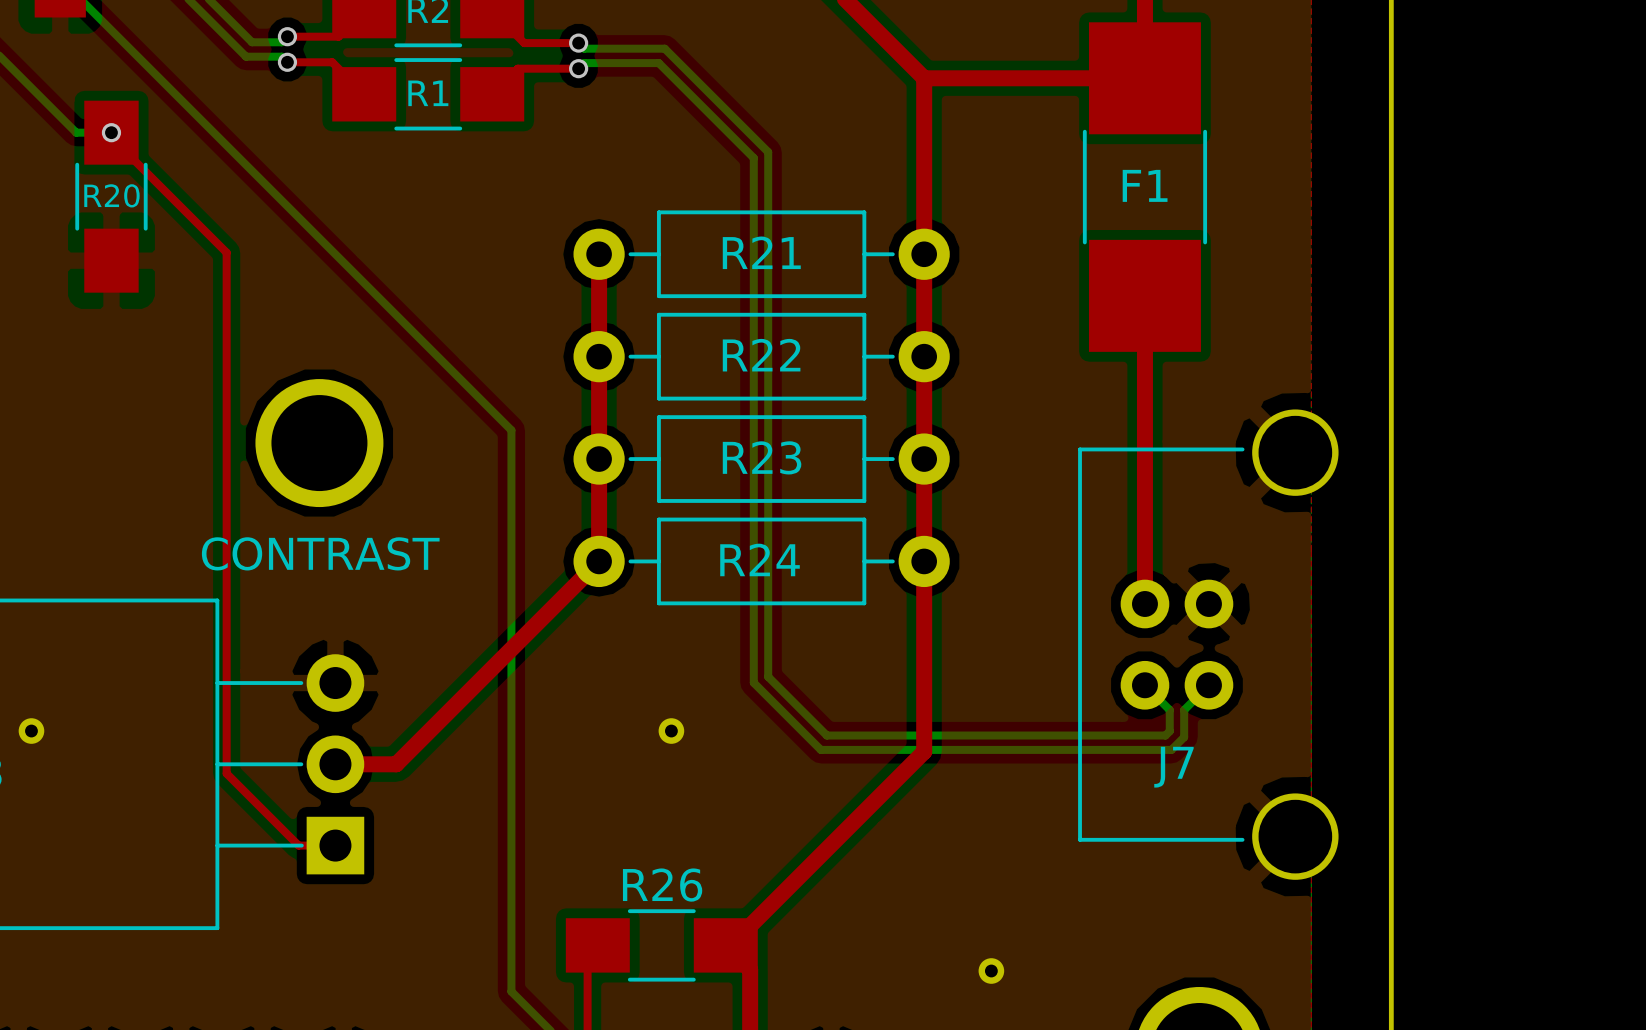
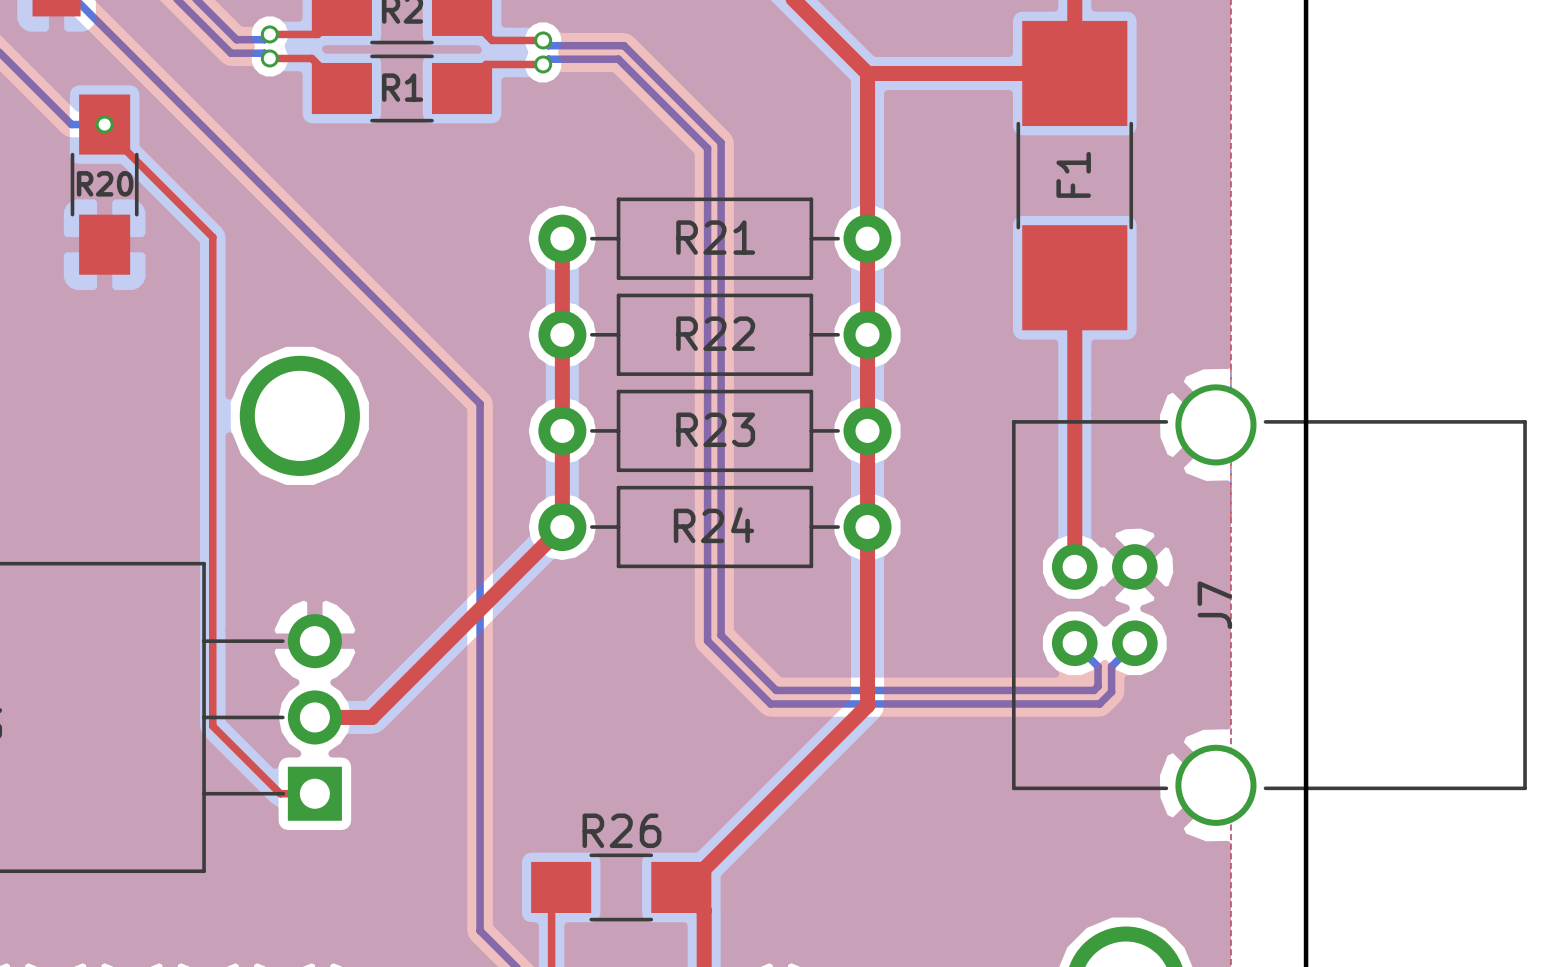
F1 name rotation: 0° (1145, 185) -> 90° counterclockwise (1073, 174)
J7 footprint: [1078, 409, 1339, 880] -> [1012, 384, 1527, 826]
text: CONTRAST (320, 553) -> none
part: (31, 731) -> none
part: (671, 731) -> none
J7 name position: J7 (1173, 767) -> J7 (1214, 605)
part: (991, 971) -> none

